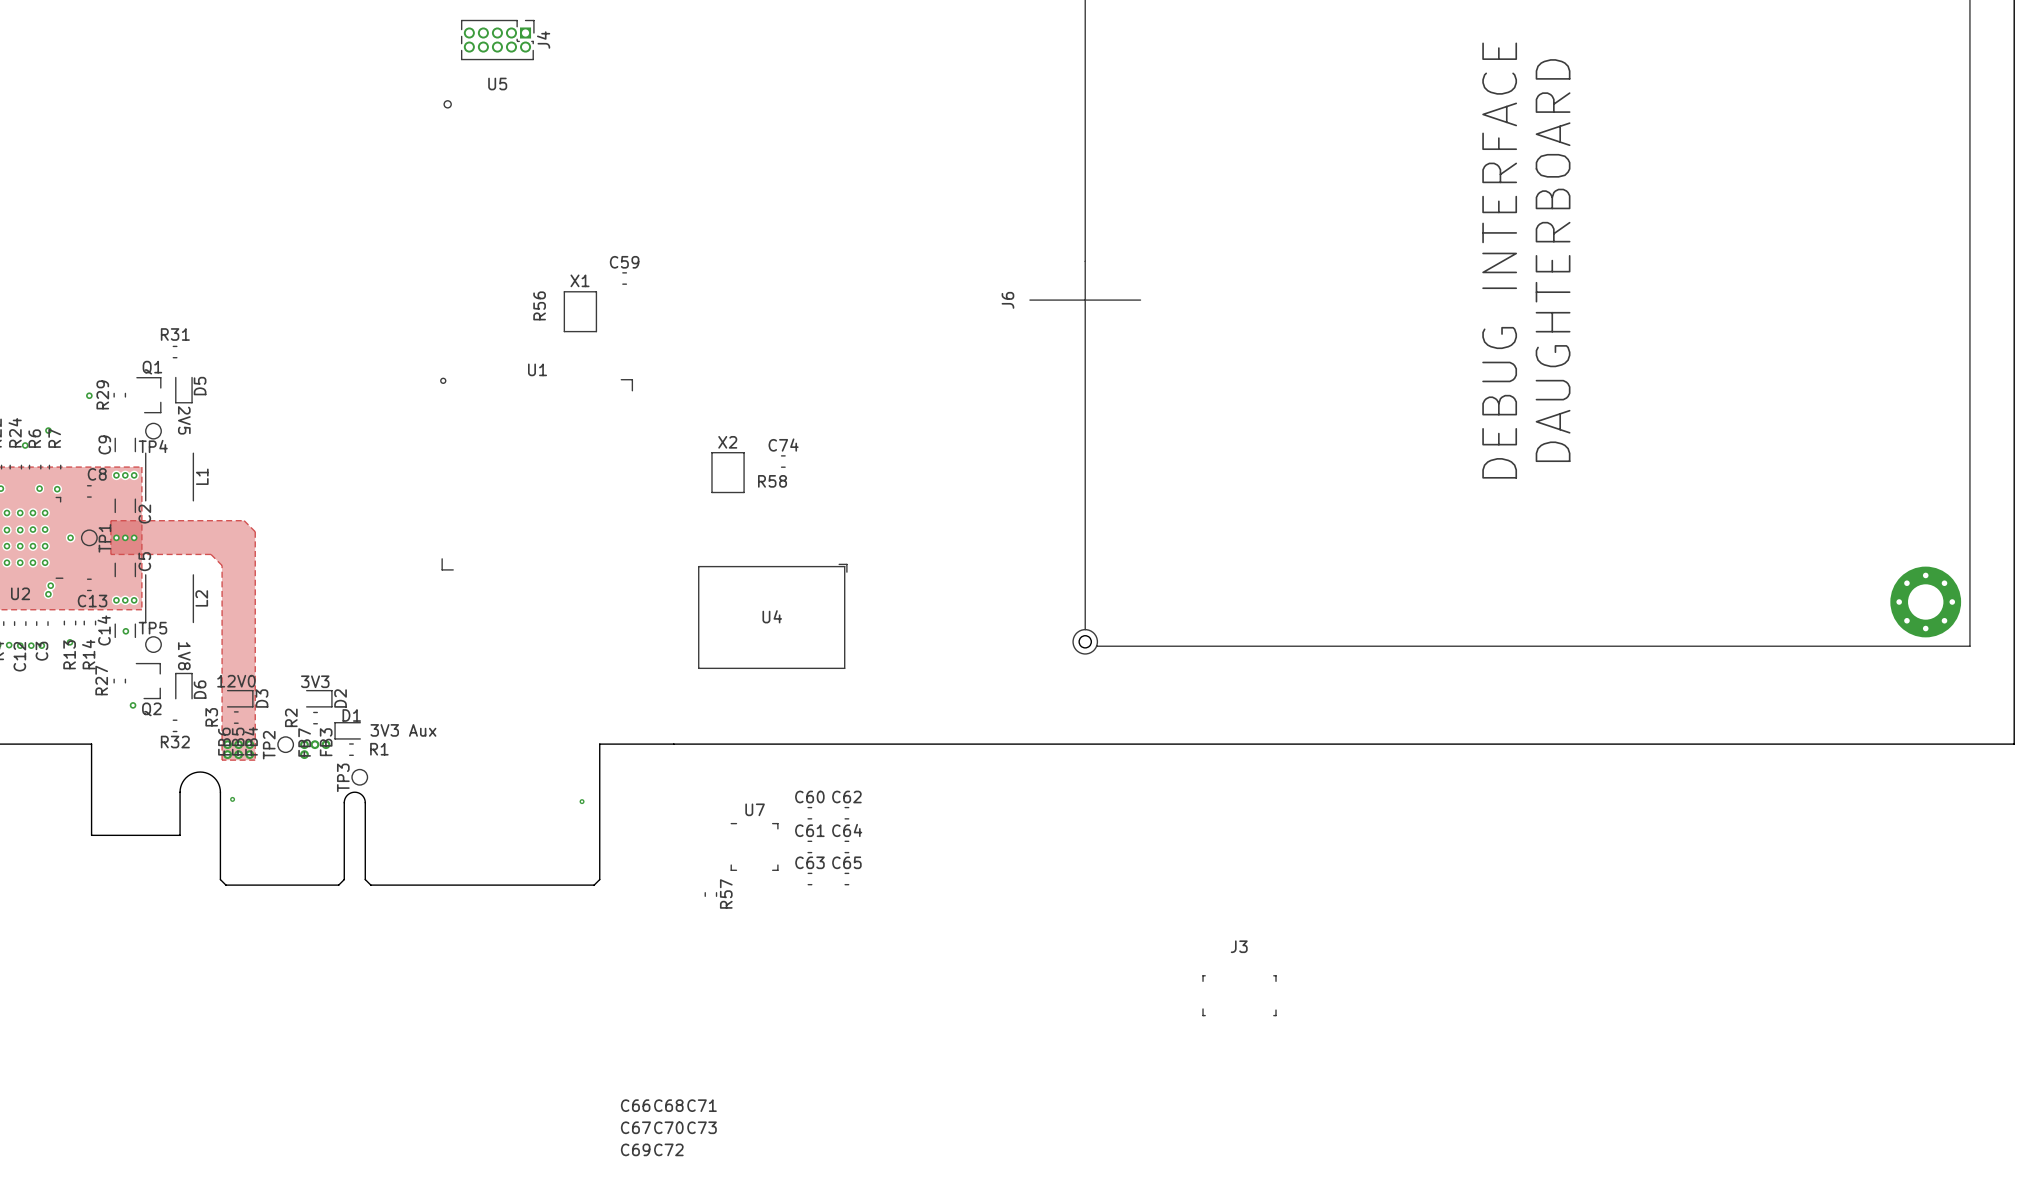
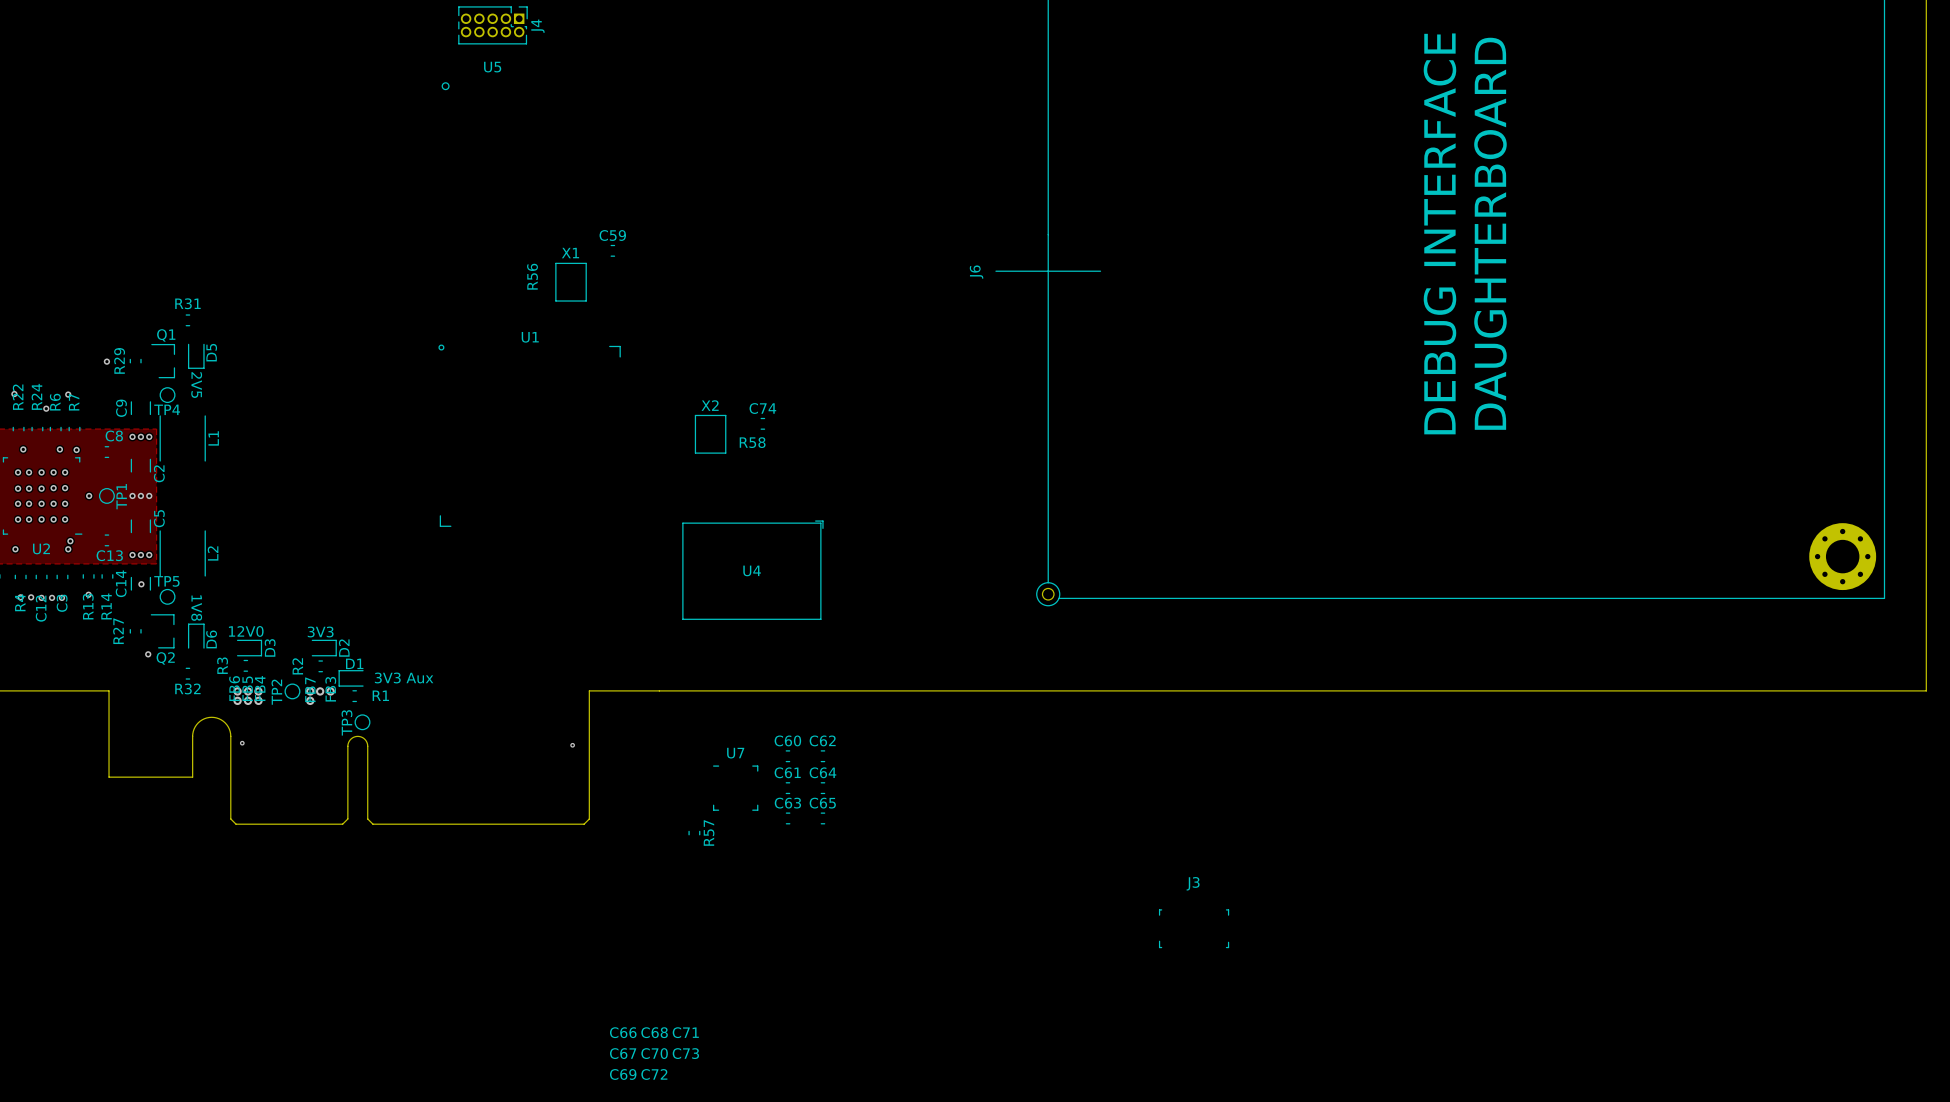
zone outline: (110, 520) (110, 554) (211, 554) (222, 565) (222, 760) (255, 760) (255, 531) (244, 520) (110, 520) -> none

